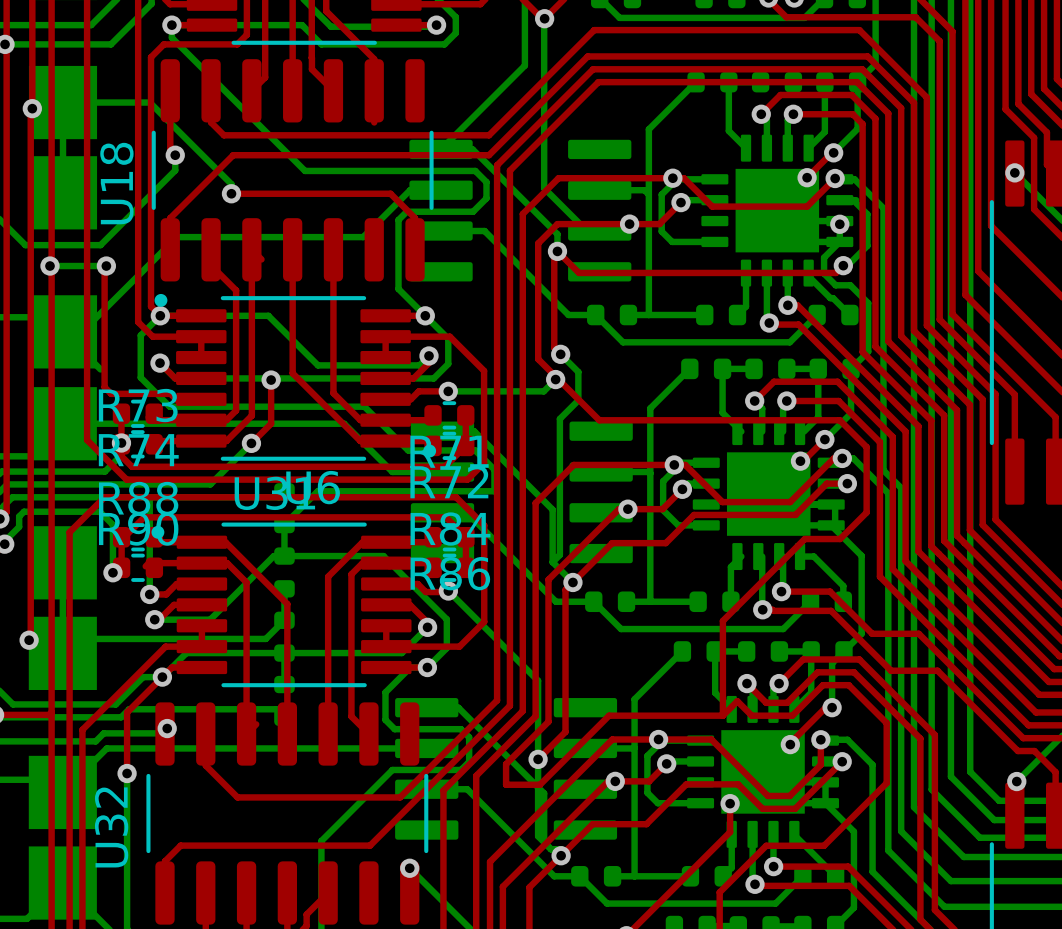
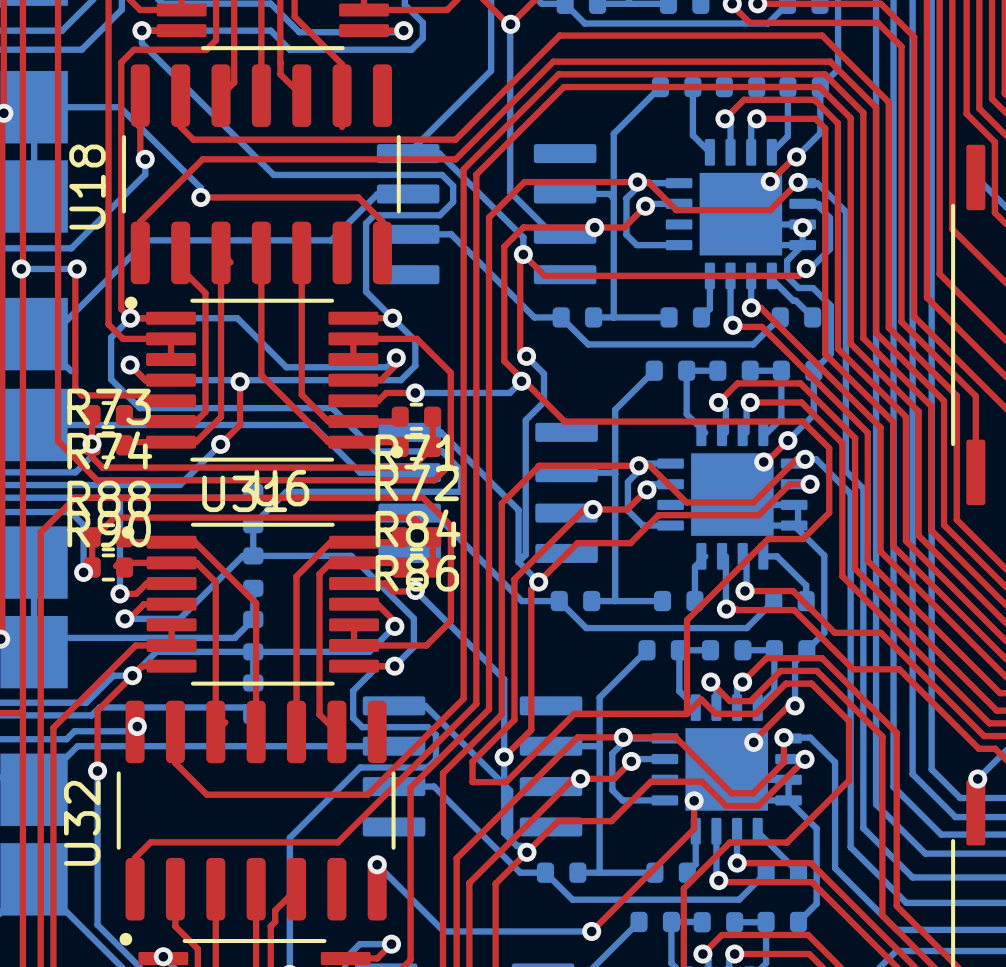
via: (1014, 172) -> none

